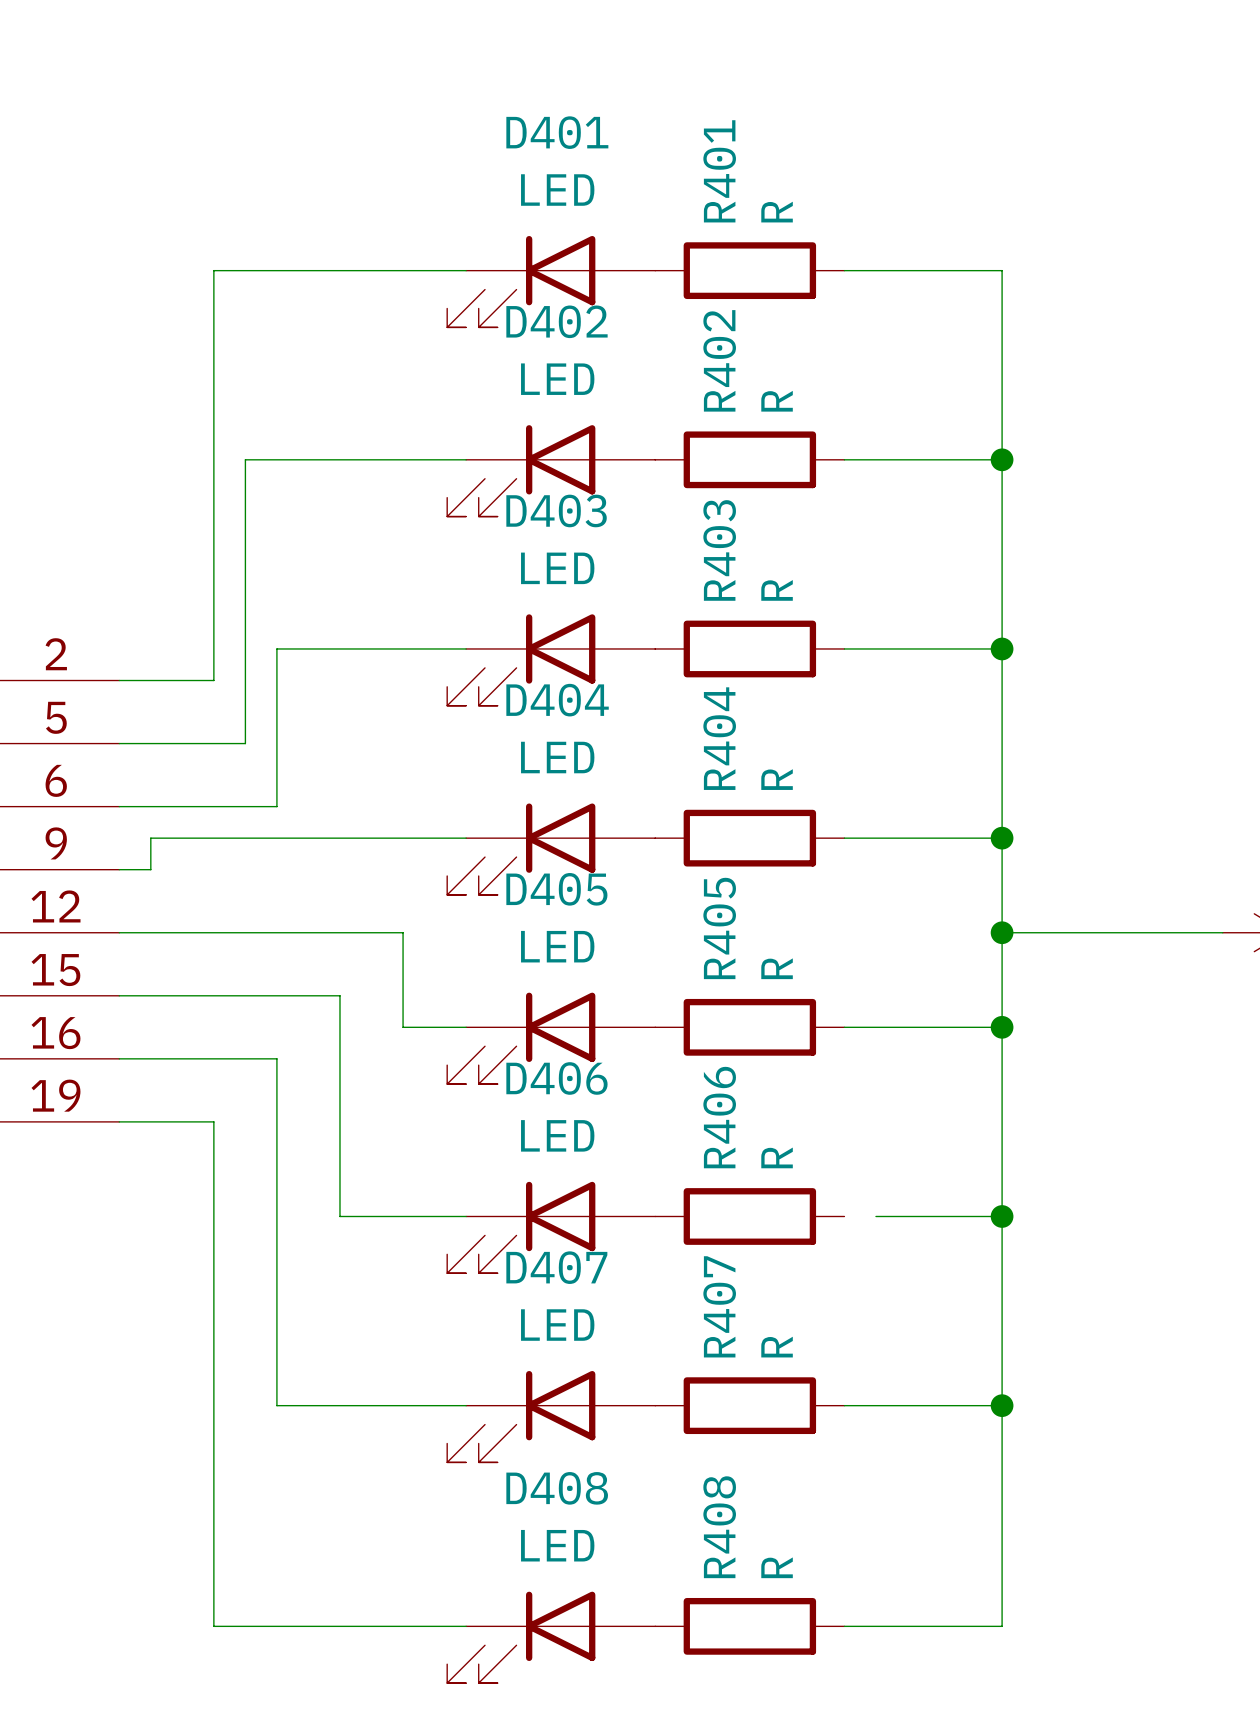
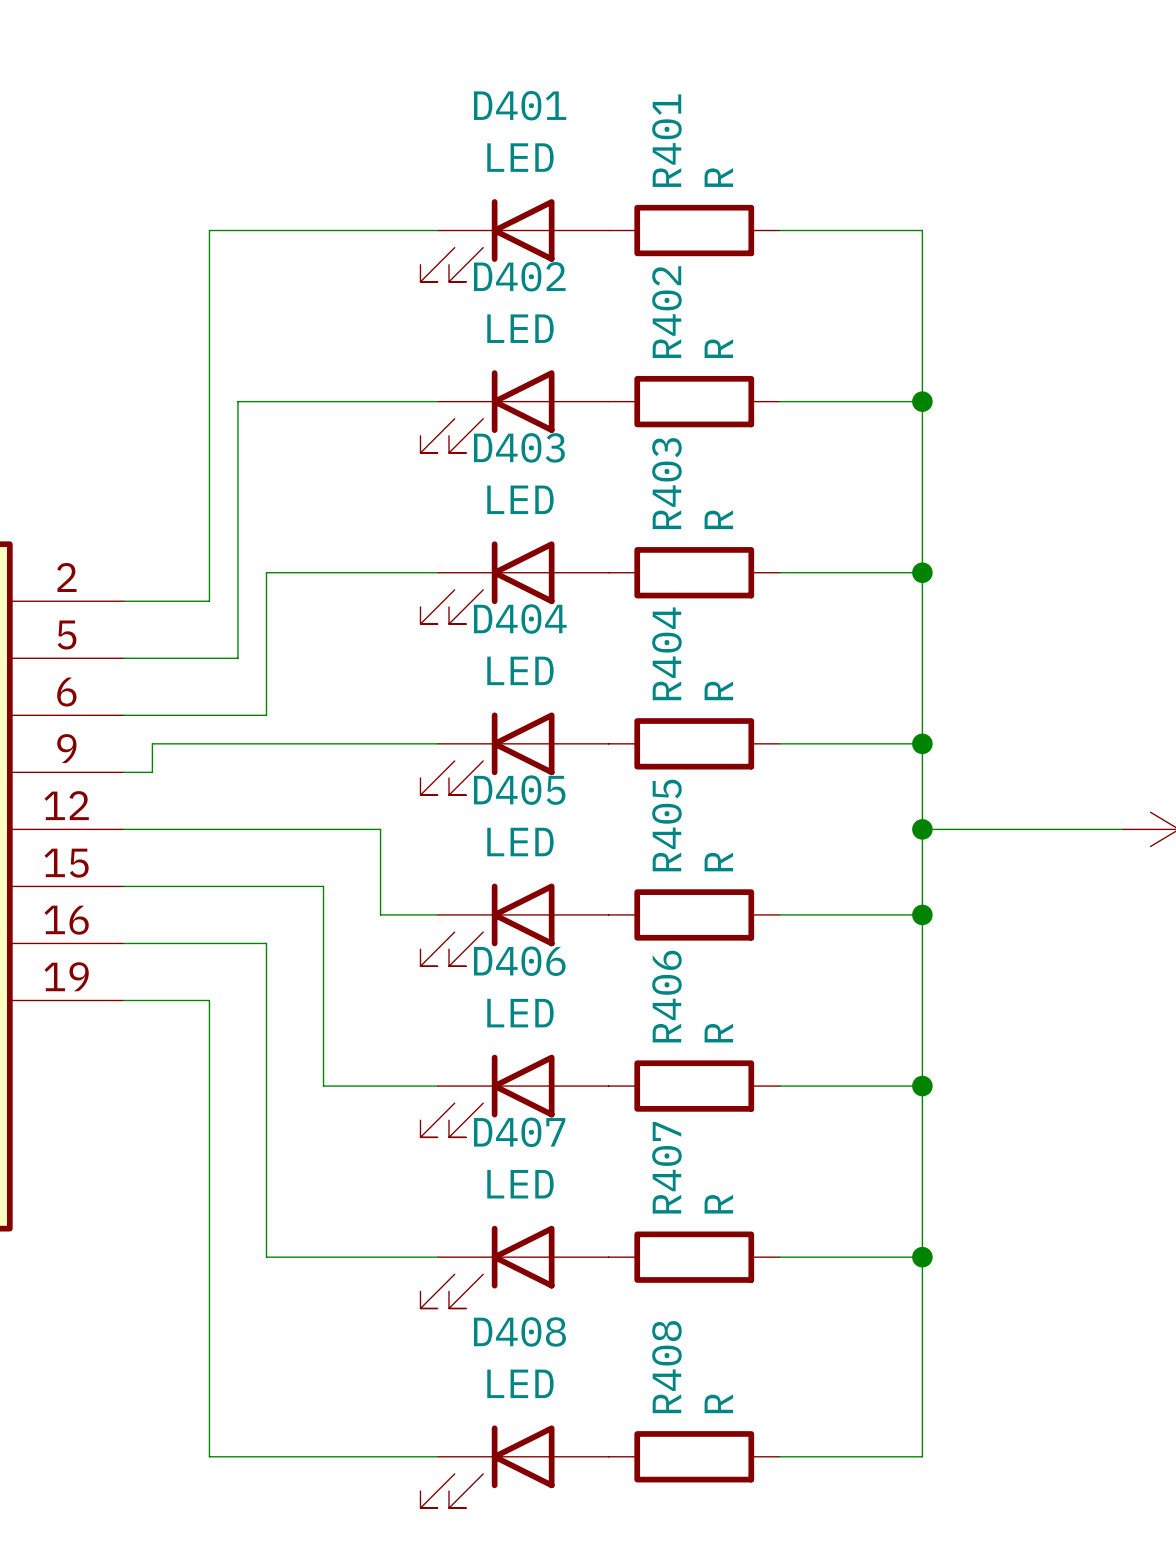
wire: none -> (779, 1086) (808, 1086)

